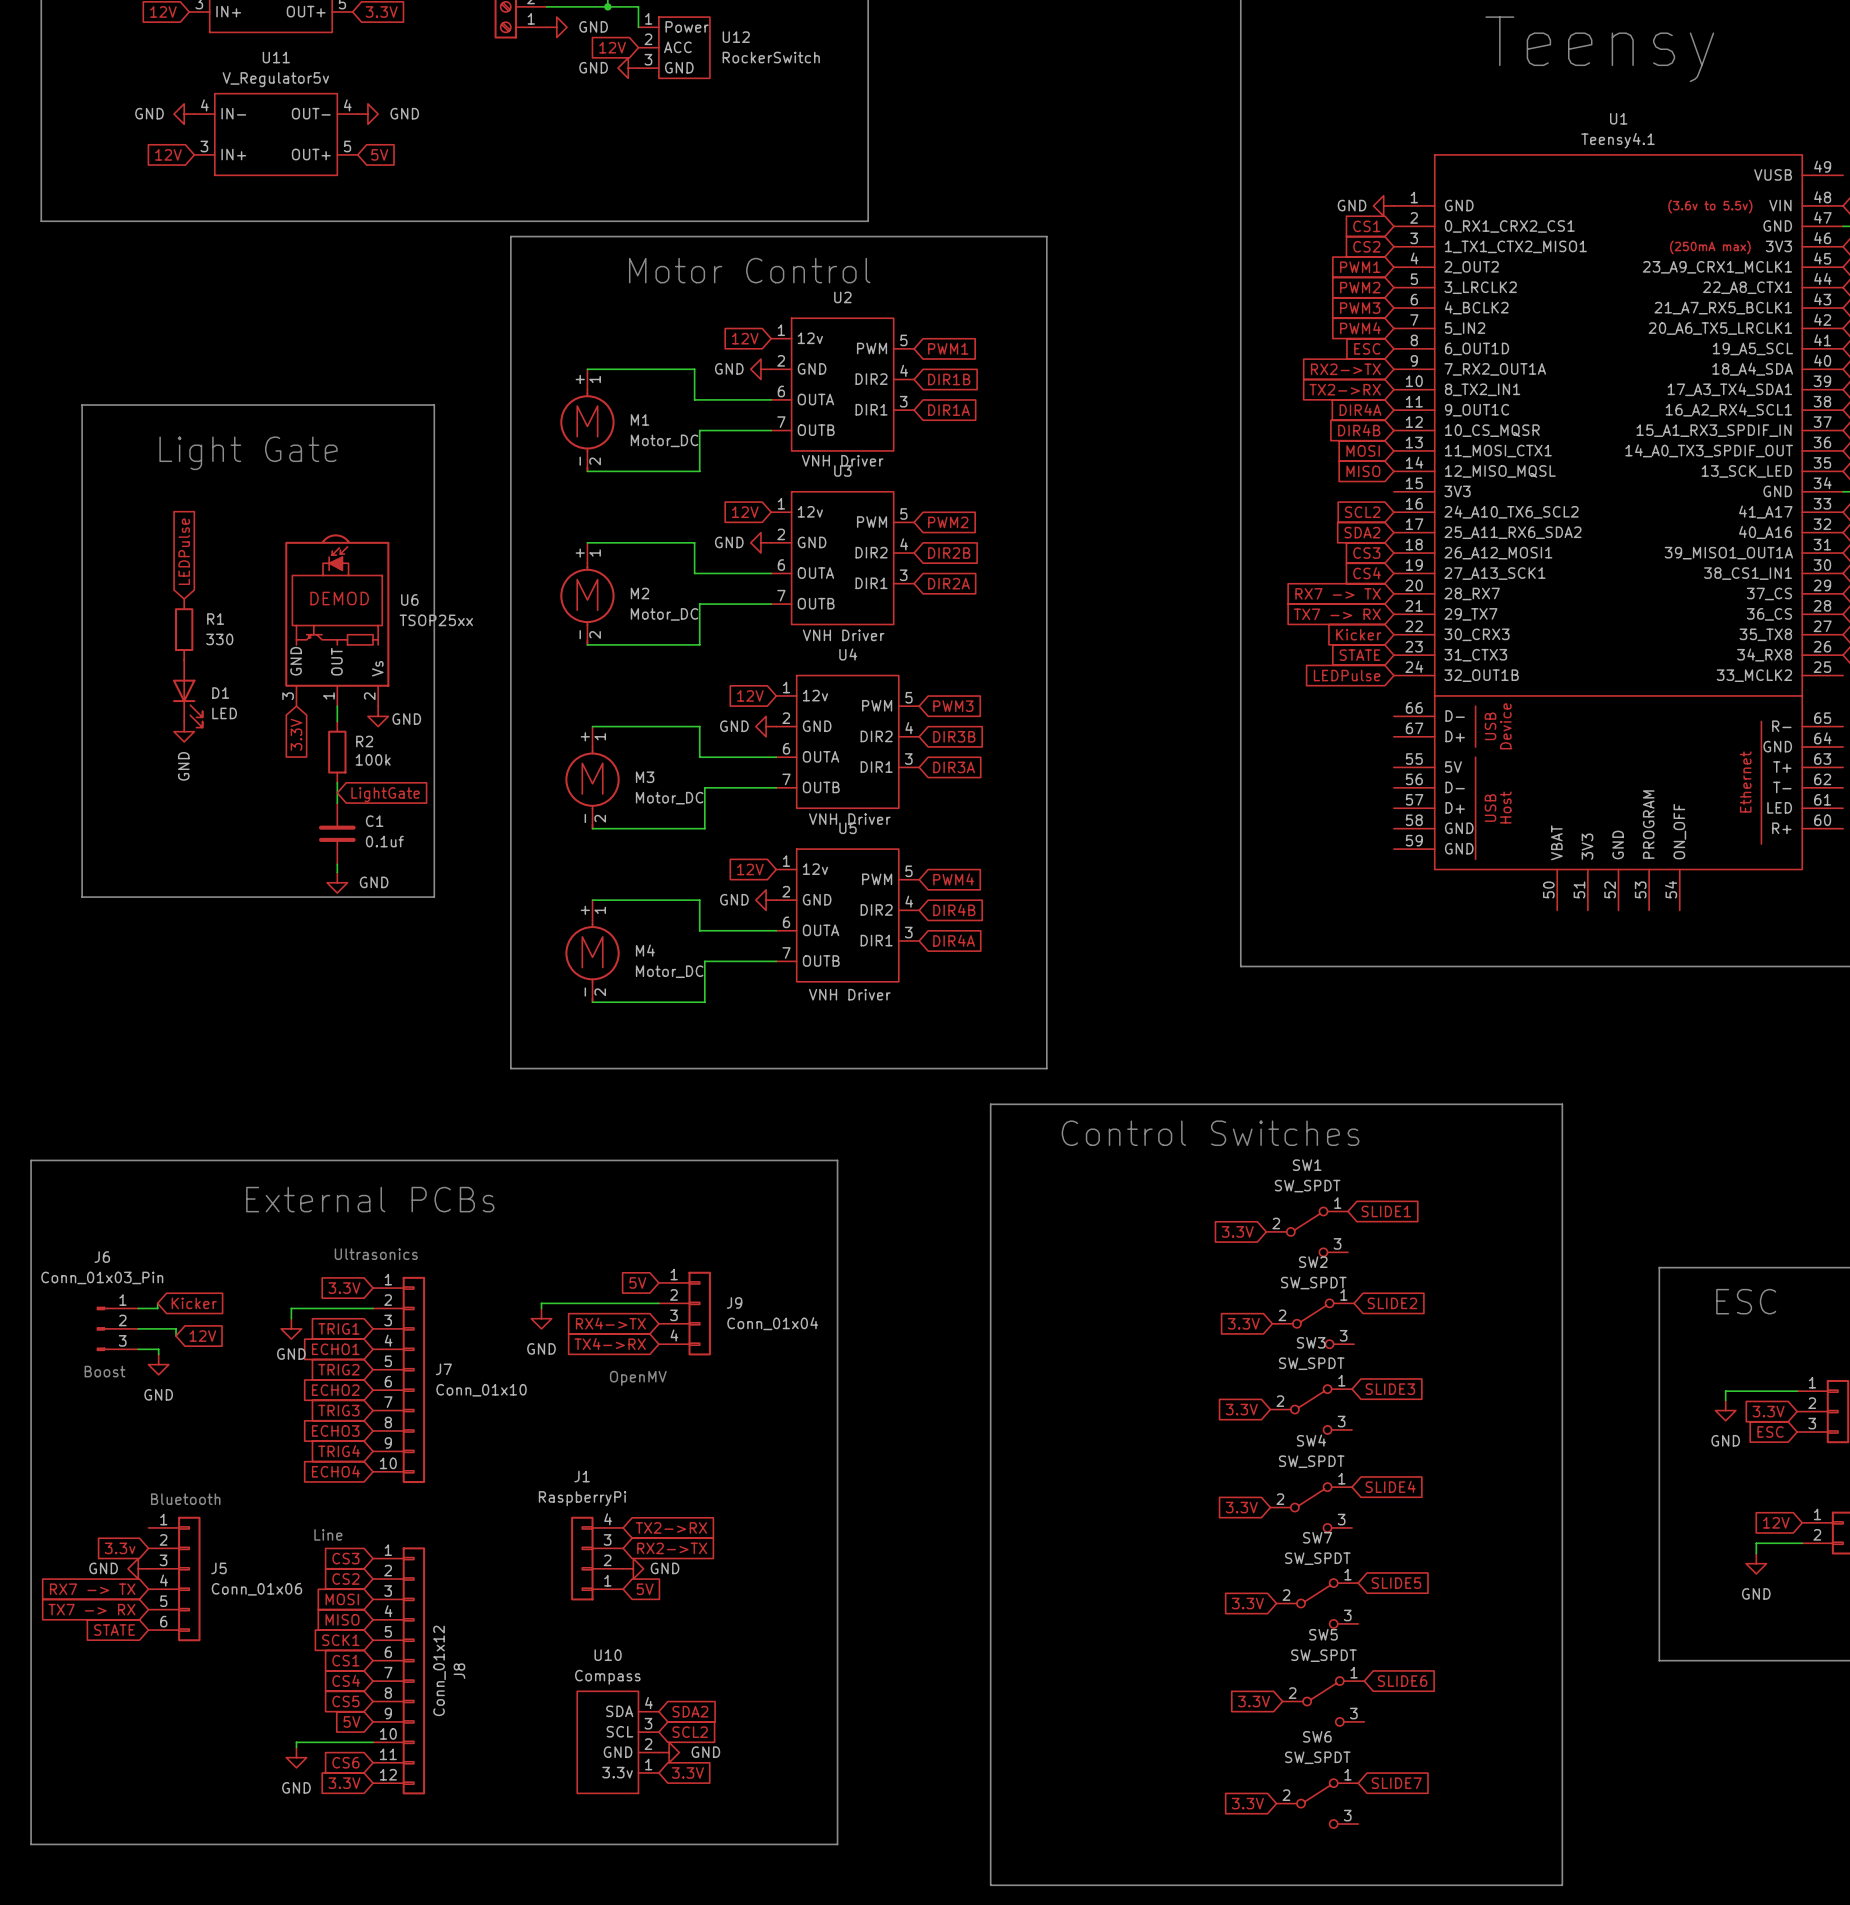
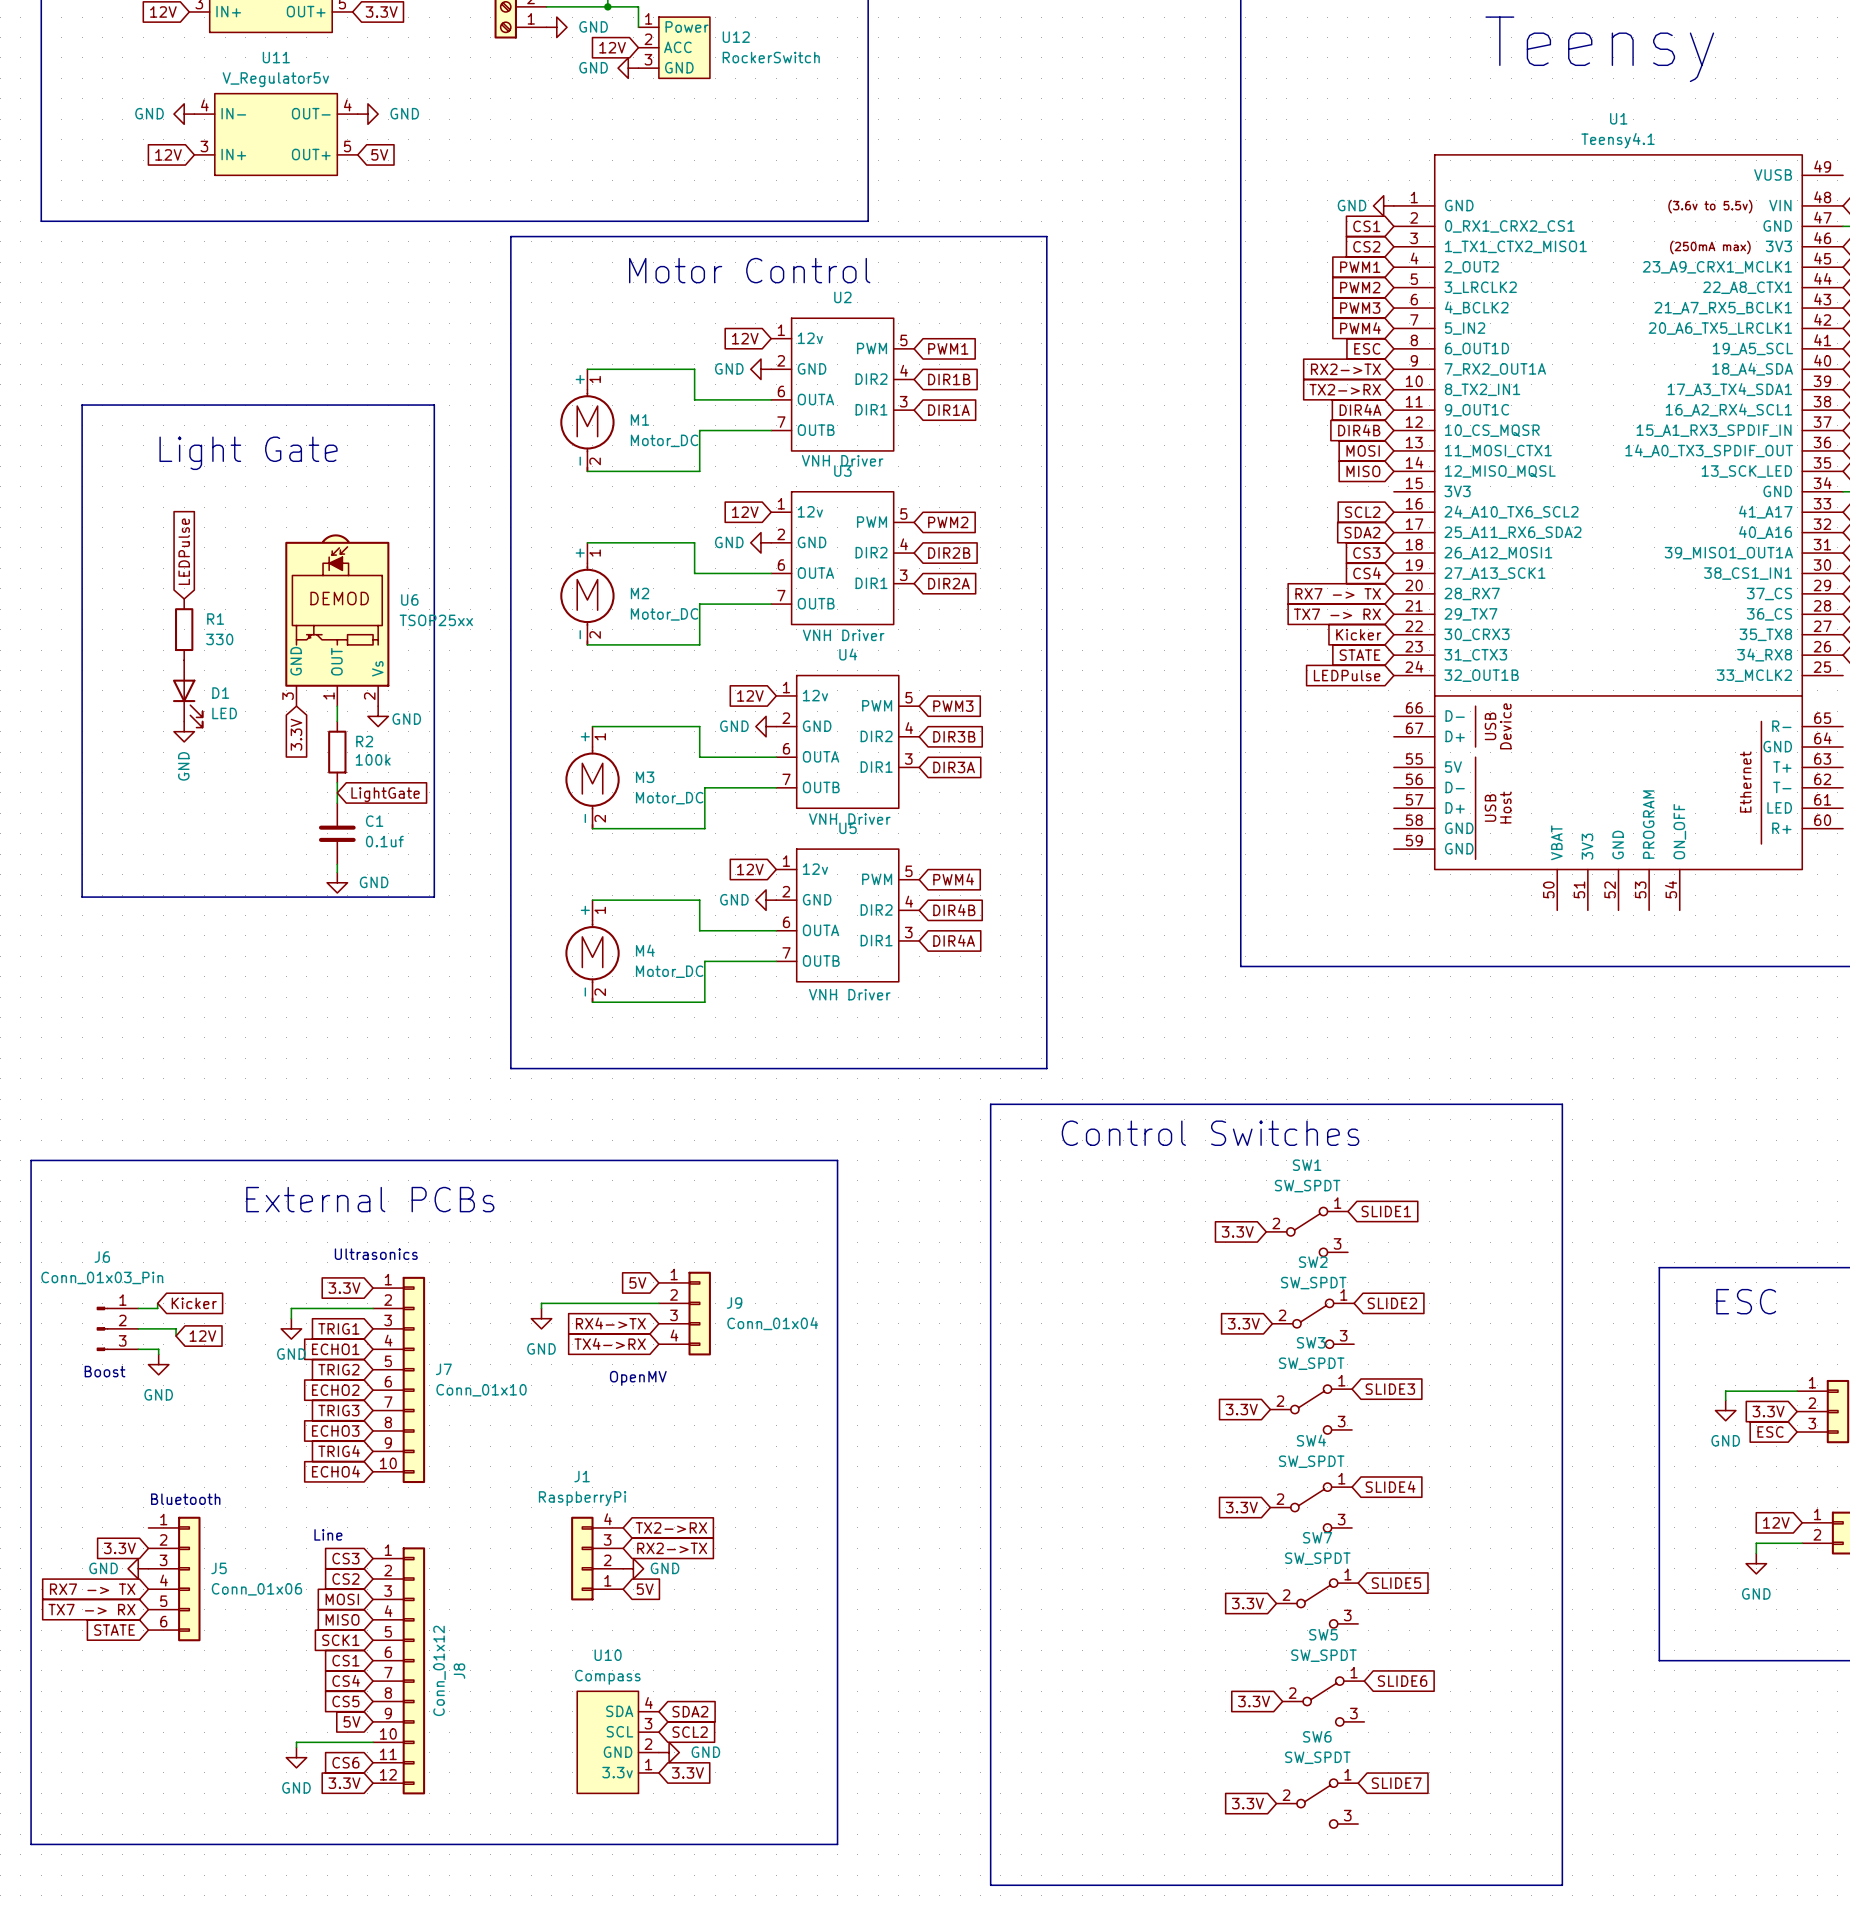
global label: 3.3v (120, 1548) -> 3.3V (119, 1548)

